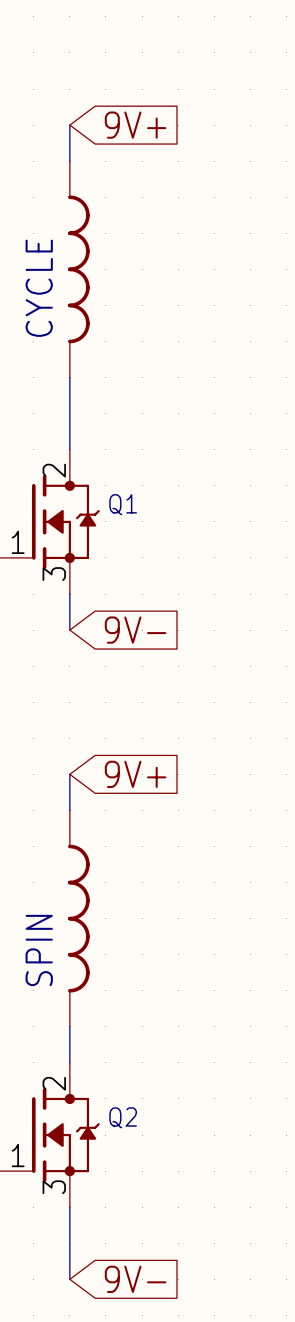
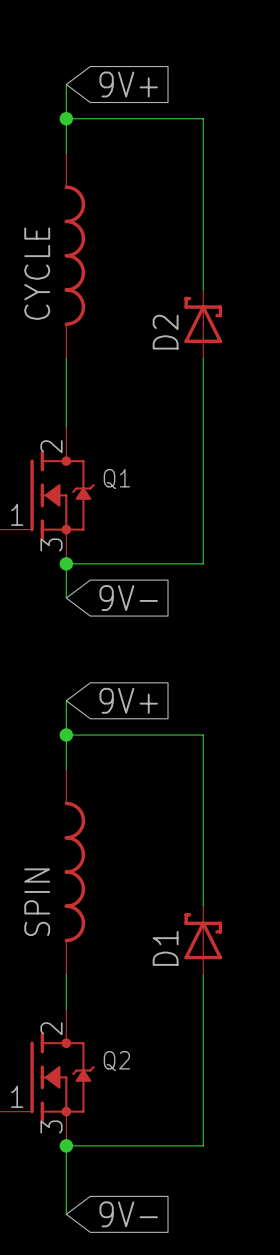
wire: none -> (66, 84) (66, 118) (203, 118) (203, 289)
junction: none -> (66, 118)
global label position: 9V+ (135, 125) -> 9V+ (128, 84)
D2: none -> (203, 324)
wire: none -> (203, 358) (203, 563) (66, 563)
junction: none -> (66, 563)
wire: none -> (66, 700) (66, 735) (203, 735) (203, 906)
junction: none -> (66, 735)
global label position: 9V+ (135, 774) -> 9V+ (128, 700)
D1: none -> (203, 940)
wire: none -> (203, 974) (203, 1145) (66, 1145)
junction: none -> (66, 1145)

